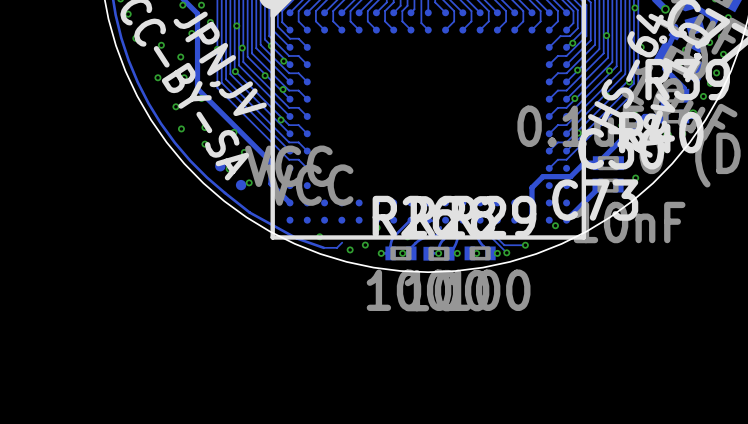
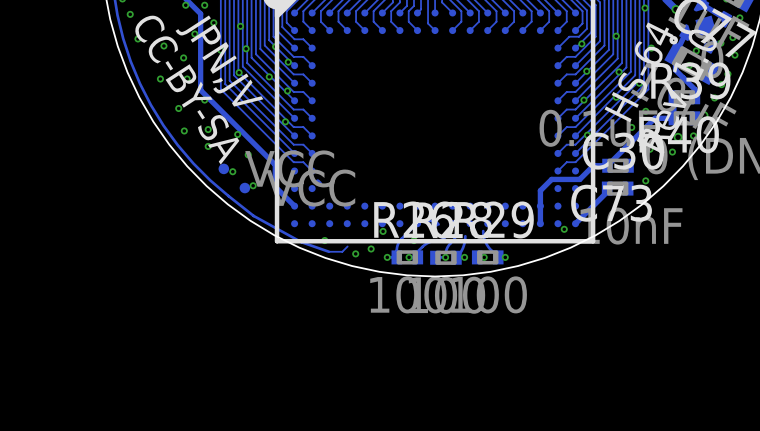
track: (484, 230) (506, 252) -> none
track: (491, 232) (504, 245) (525, 245) -> none
via: (525, 245) -> none
via: (506, 252) -> none

